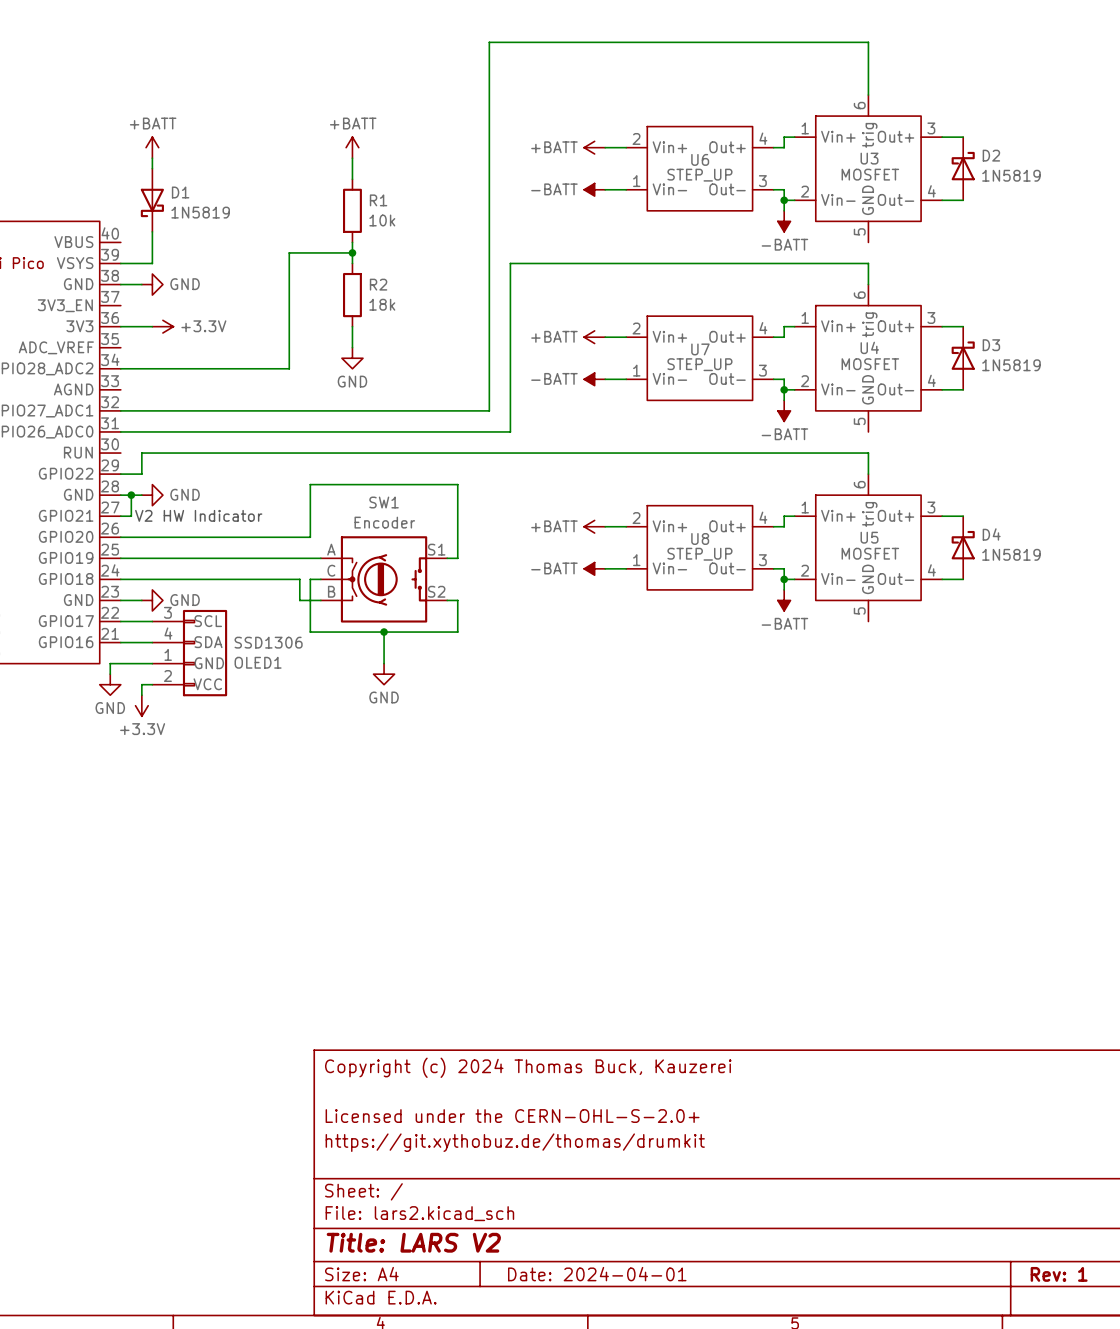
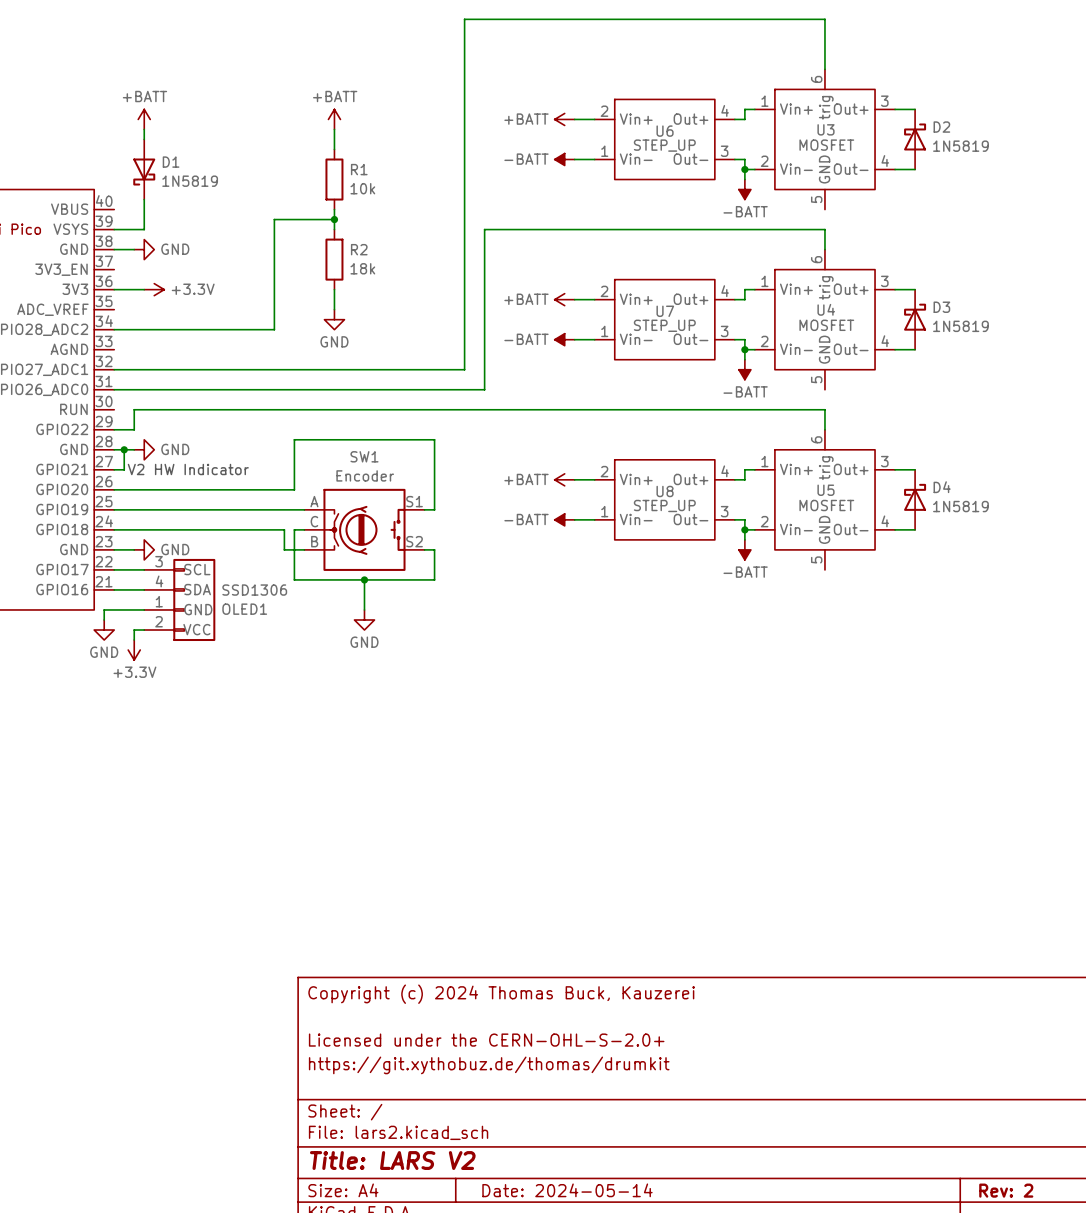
title block: Date: 2024-04-01 (597, 1274) -> Date: 2024-05-14 (567, 1190)
title block: Rev: 1 (1059, 1274) -> Rev: 2 (1006, 1190)

